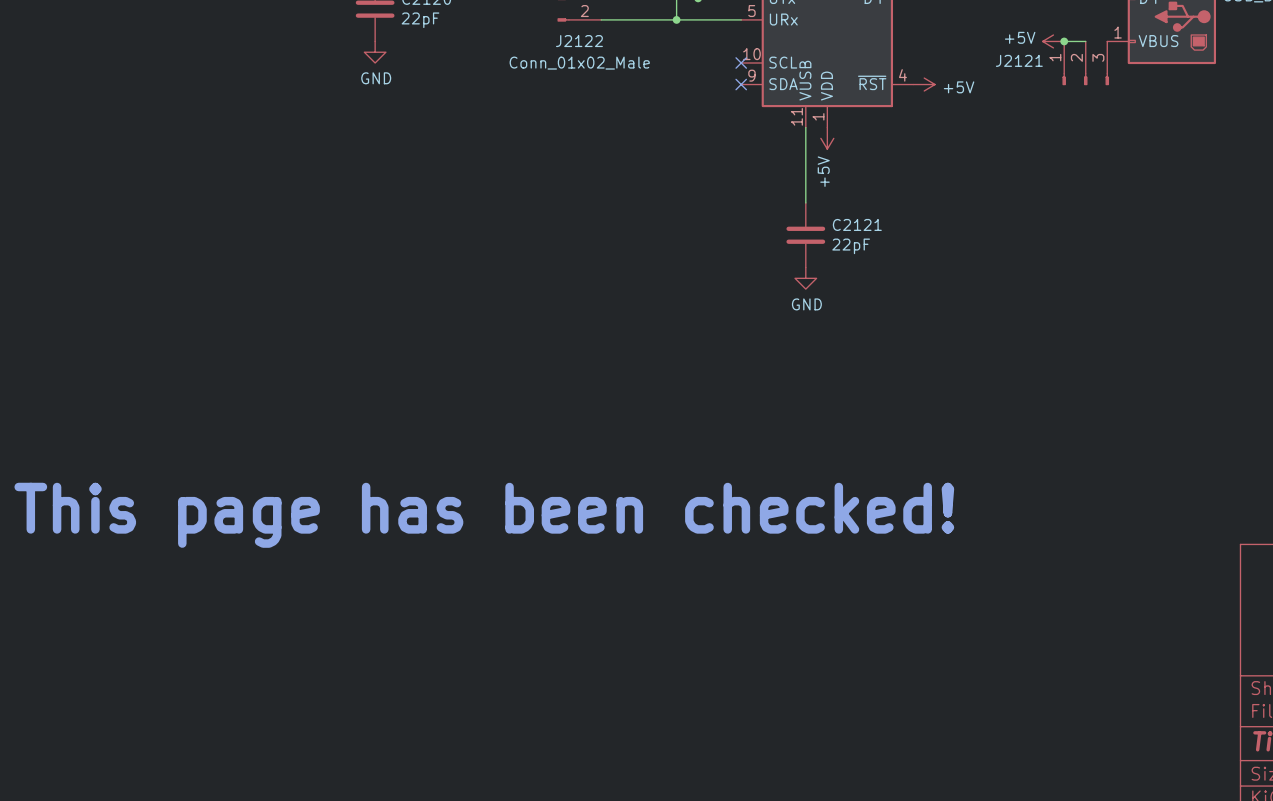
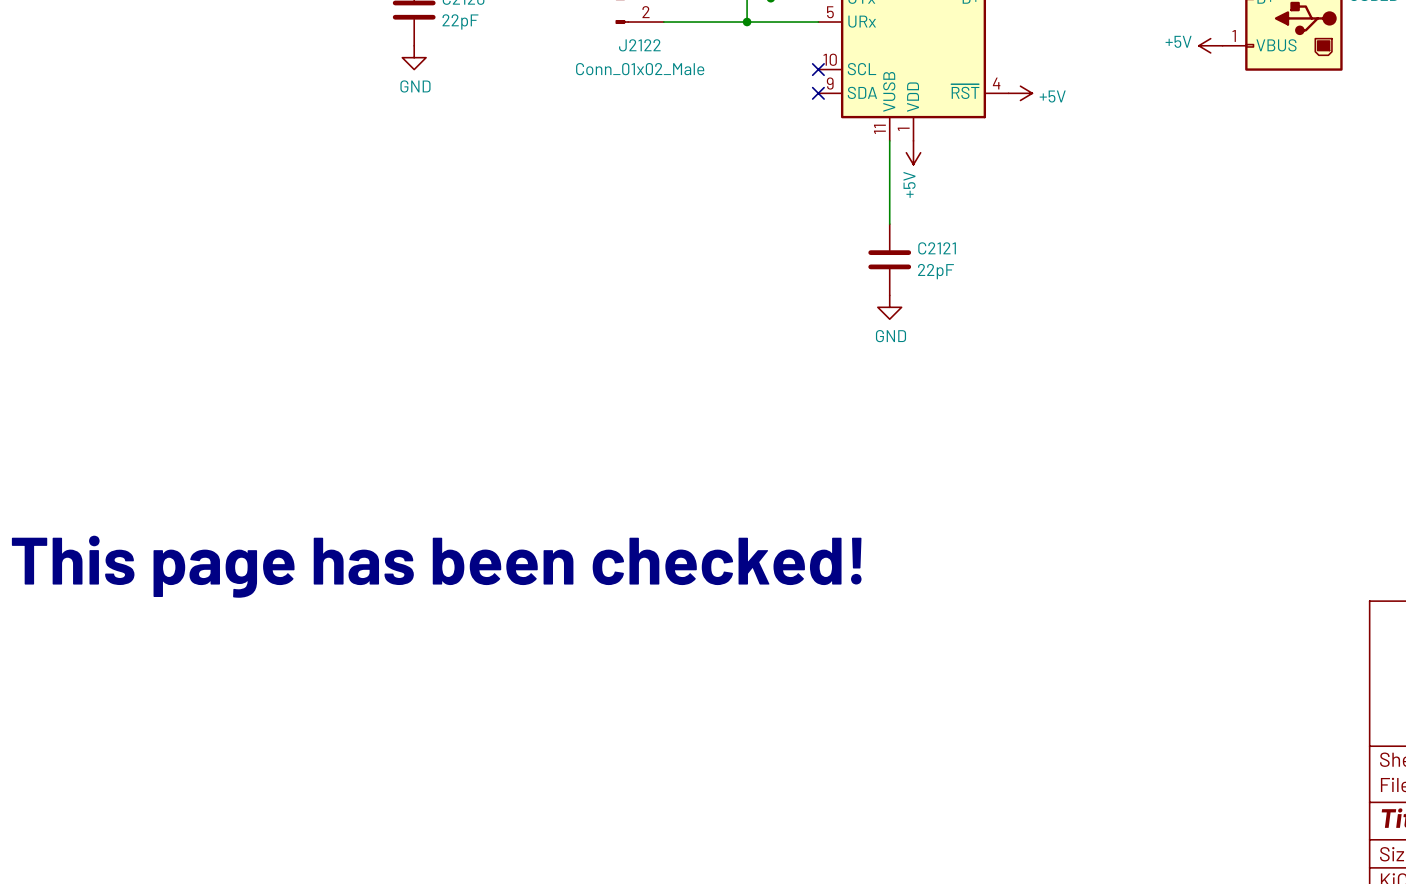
power symbol position: +5V (1053, 41) -> +5V (1210, 45)
wire: (1064, 41) (1085, 41) -> none
junction: (1064, 41) -> none
J2121: (1085, 63) -> none

